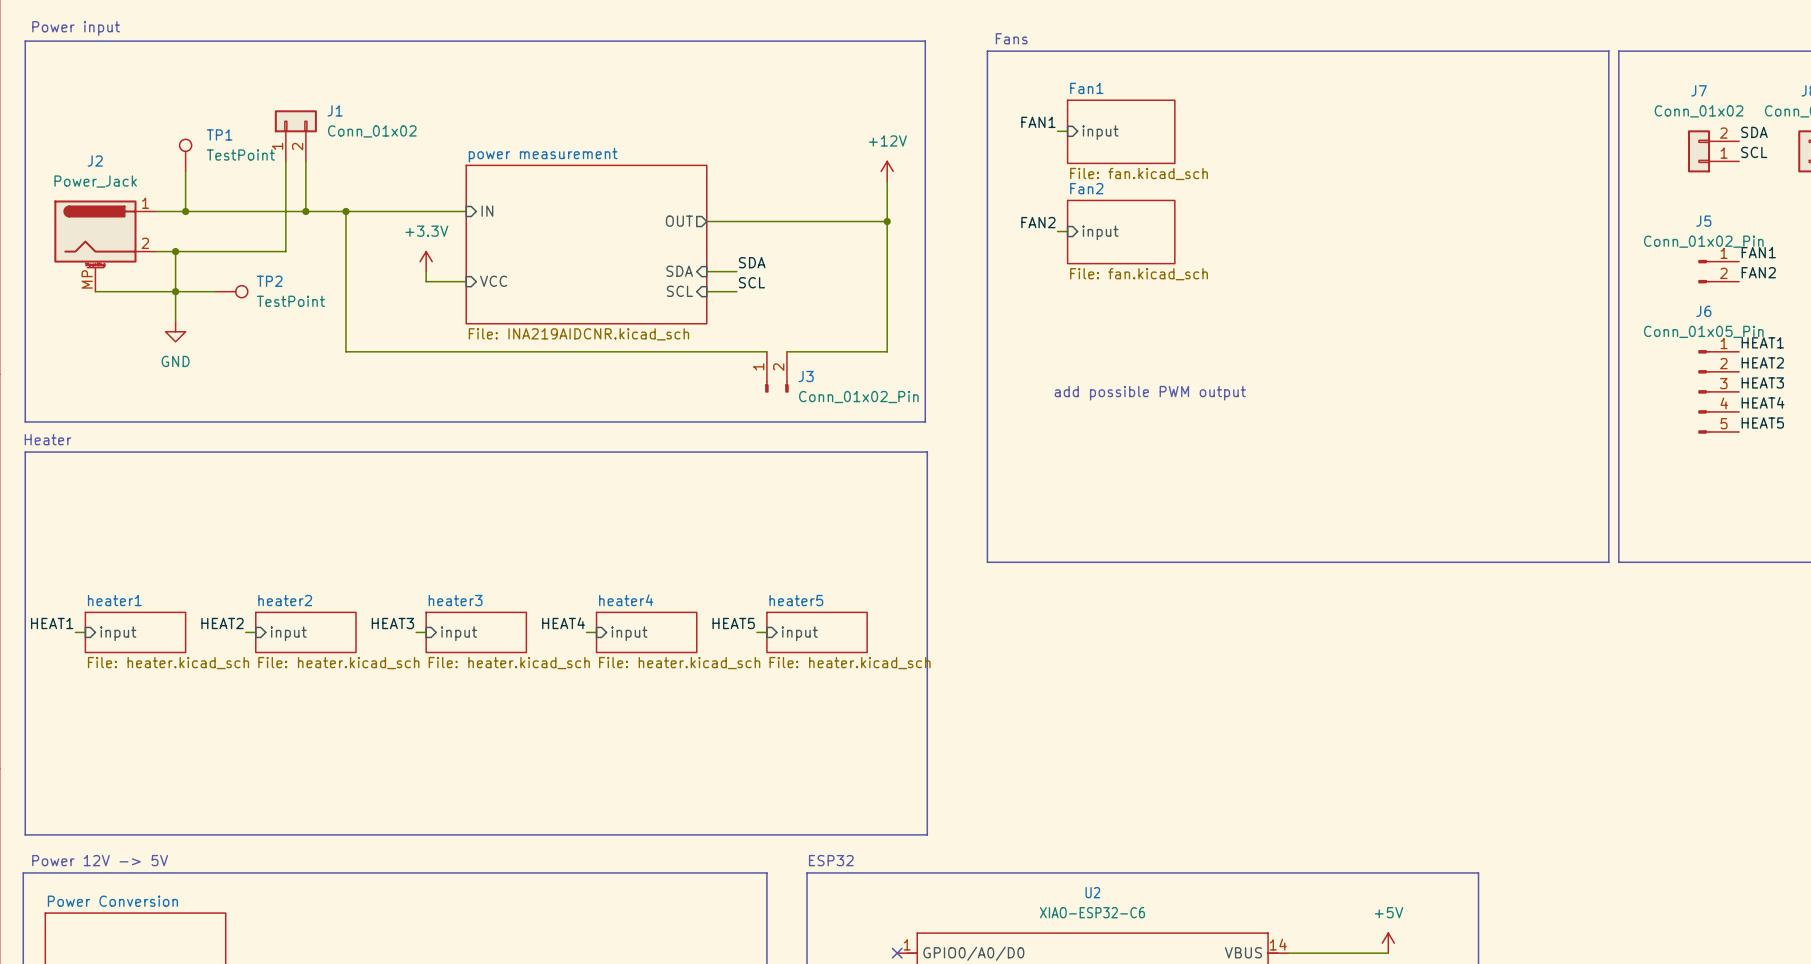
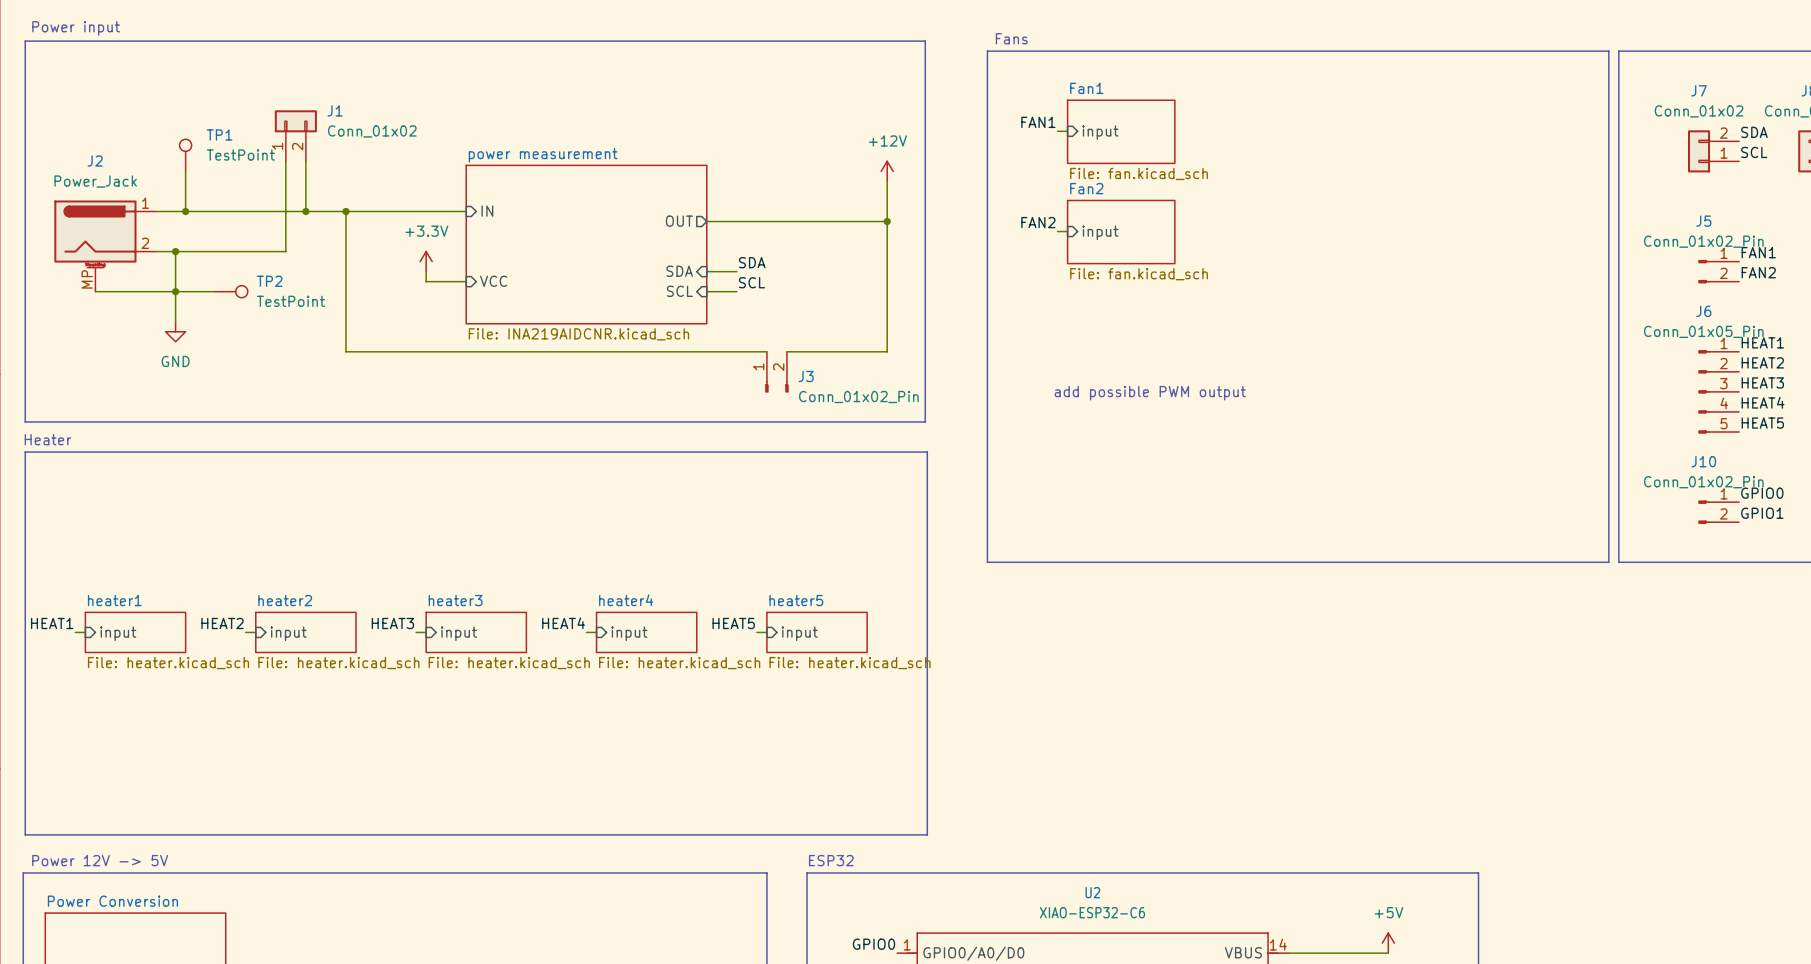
label: none -> GPIO0 (1762, 493)
J10: none -> Conn_01x02_Pin (1718, 512)
label: none -> GPIO1 (1762, 513)
label: none -> GPIO0 (873, 944)
no-connect mark: (897, 953) -> none

